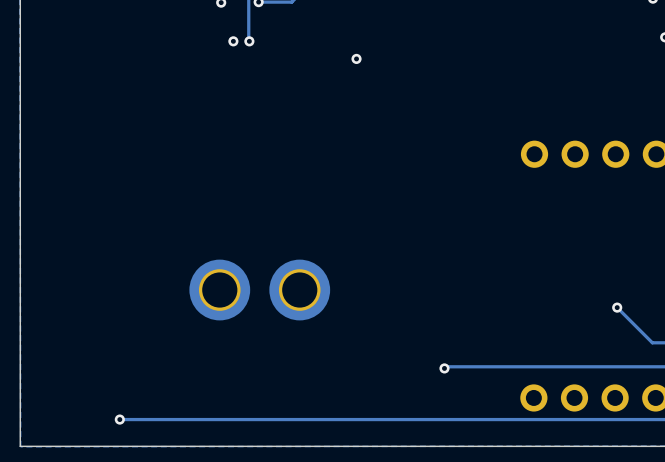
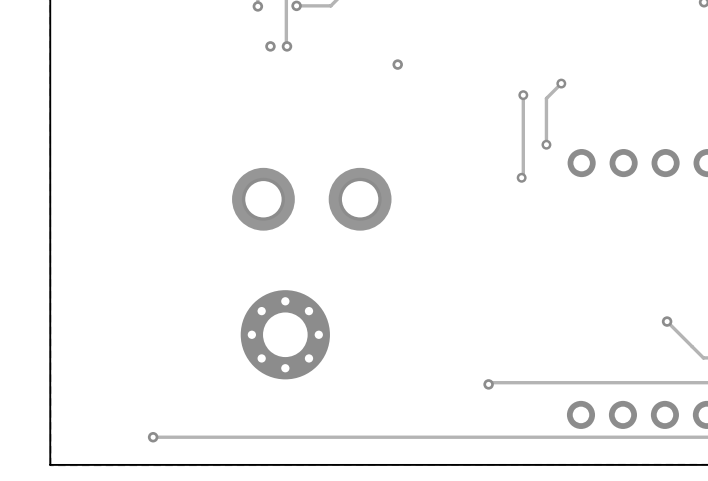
track: none -> (561, 83) (546, 98) (546, 144)
via: none -> (561, 83)
track: none -> (523, 95) (523, 176) (521, 177)
via: none -> (523, 95)
via: none -> (546, 144)
via: none -> (521, 177)
part: none -> (311, 199)
part: (259, 290) -> none
part: none -> (285, 334)

